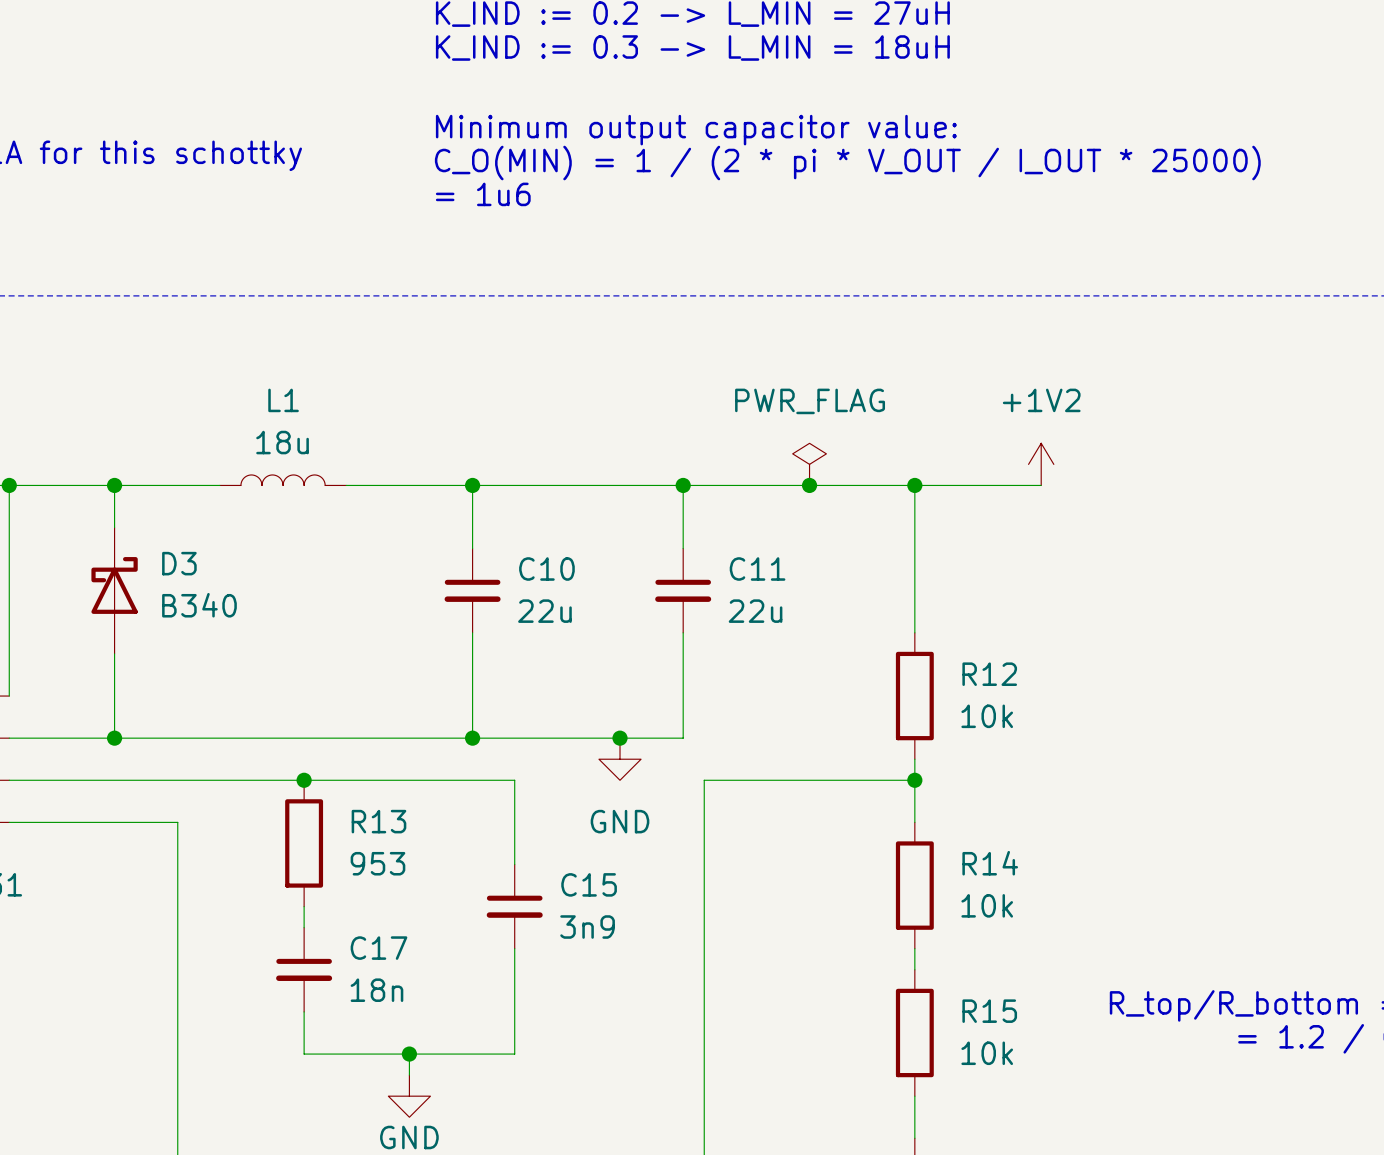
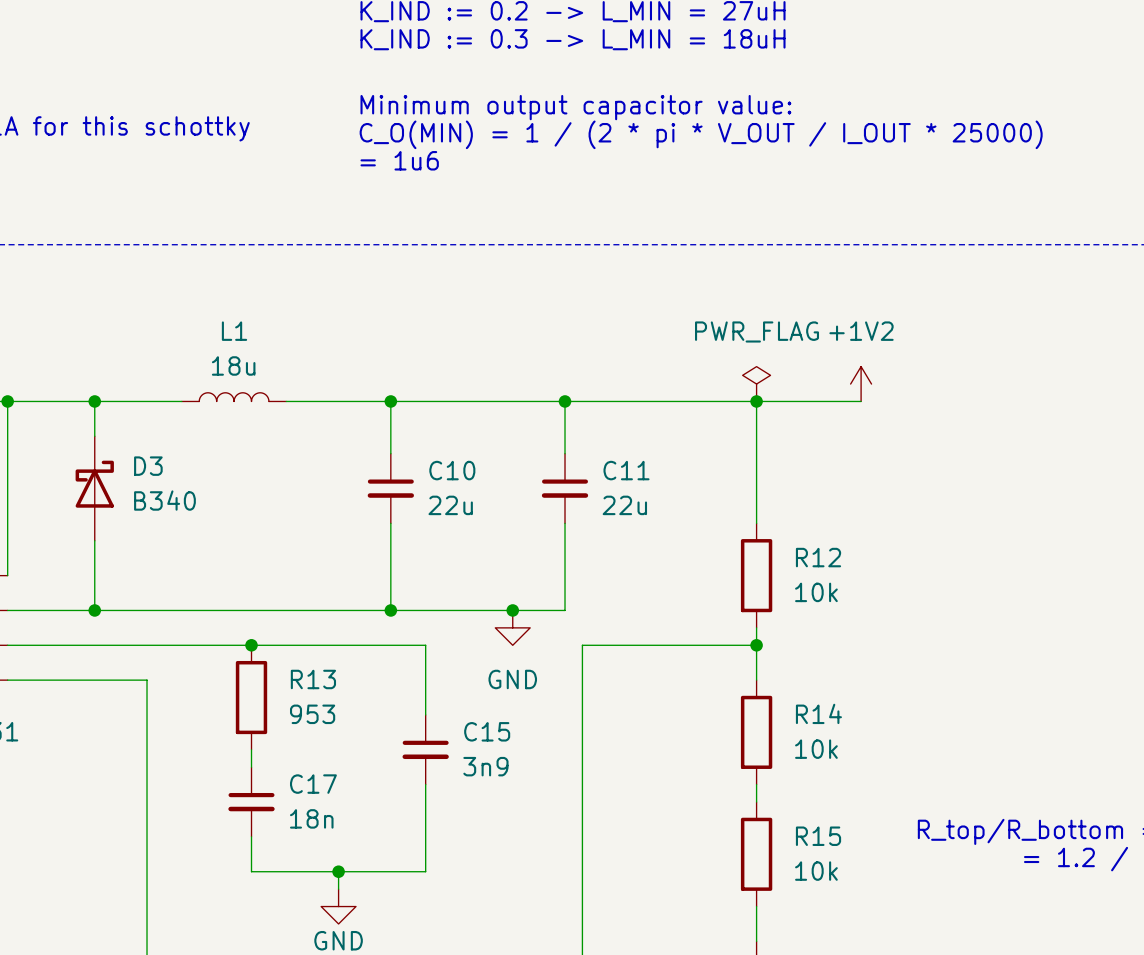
power symbol position: PWR_FLAG (809, 464) -> PWR_FLAG (756, 384)
junction: (809, 485) -> none

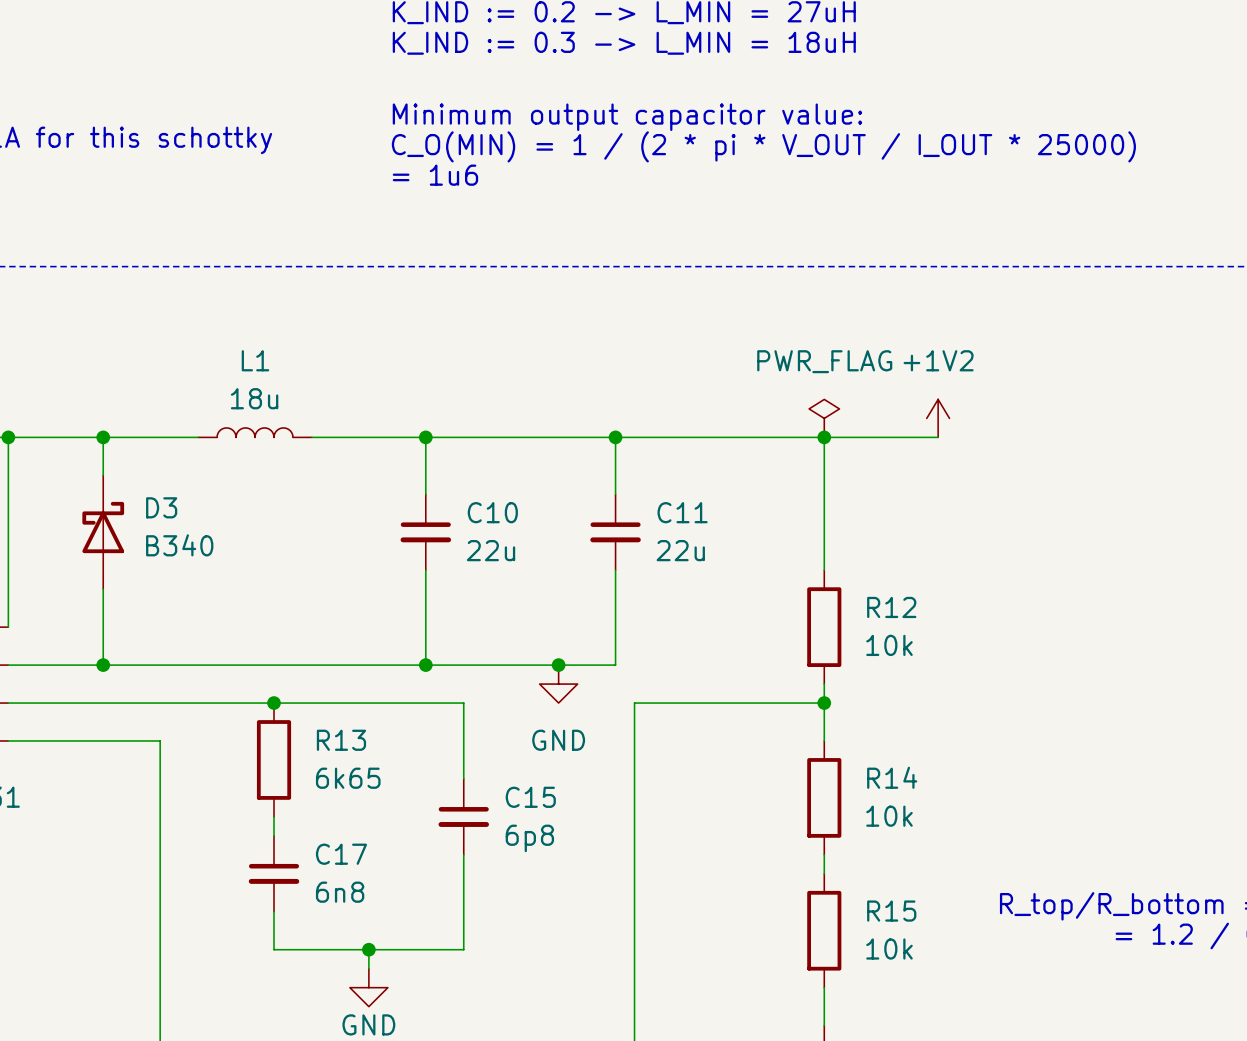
R13 value: 953 (312, 714) -> 6k65 (348, 778)
C15 value: 3n9 (485, 766) -> 6p8 (529, 838)
C17 value: 18n (311, 818) -> 6n8 (340, 892)

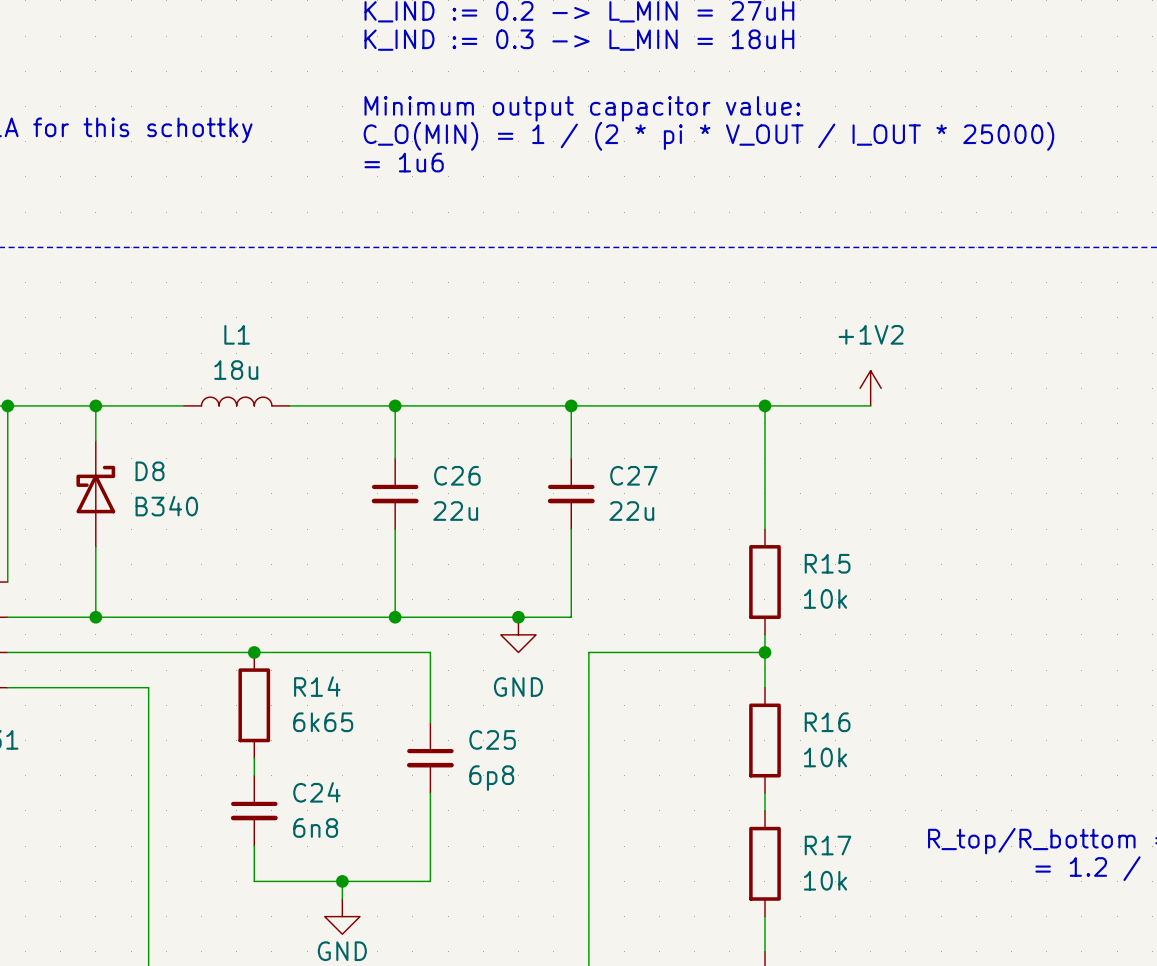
power symbol: PWR_FLAG (824, 418) -> none
D3 name: D3 (161, 507) -> D8 (150, 471)
C10 name: C10 (492, 512) -> C26 (457, 475)
C11 name: C11 (682, 512) -> C27 (633, 475)
R12 name: R12 (891, 607) -> R15 (827, 563)
R13 name: R13 (341, 740) -> R14 (317, 686)
R14 name: R14 (892, 777) -> R16 (827, 722)
C15 name: C15 (530, 797) -> C25 (492, 739)
C17 name: C17 (341, 854) -> C24 (316, 792)
R15 name: R15 (891, 911) -> R17 (828, 845)

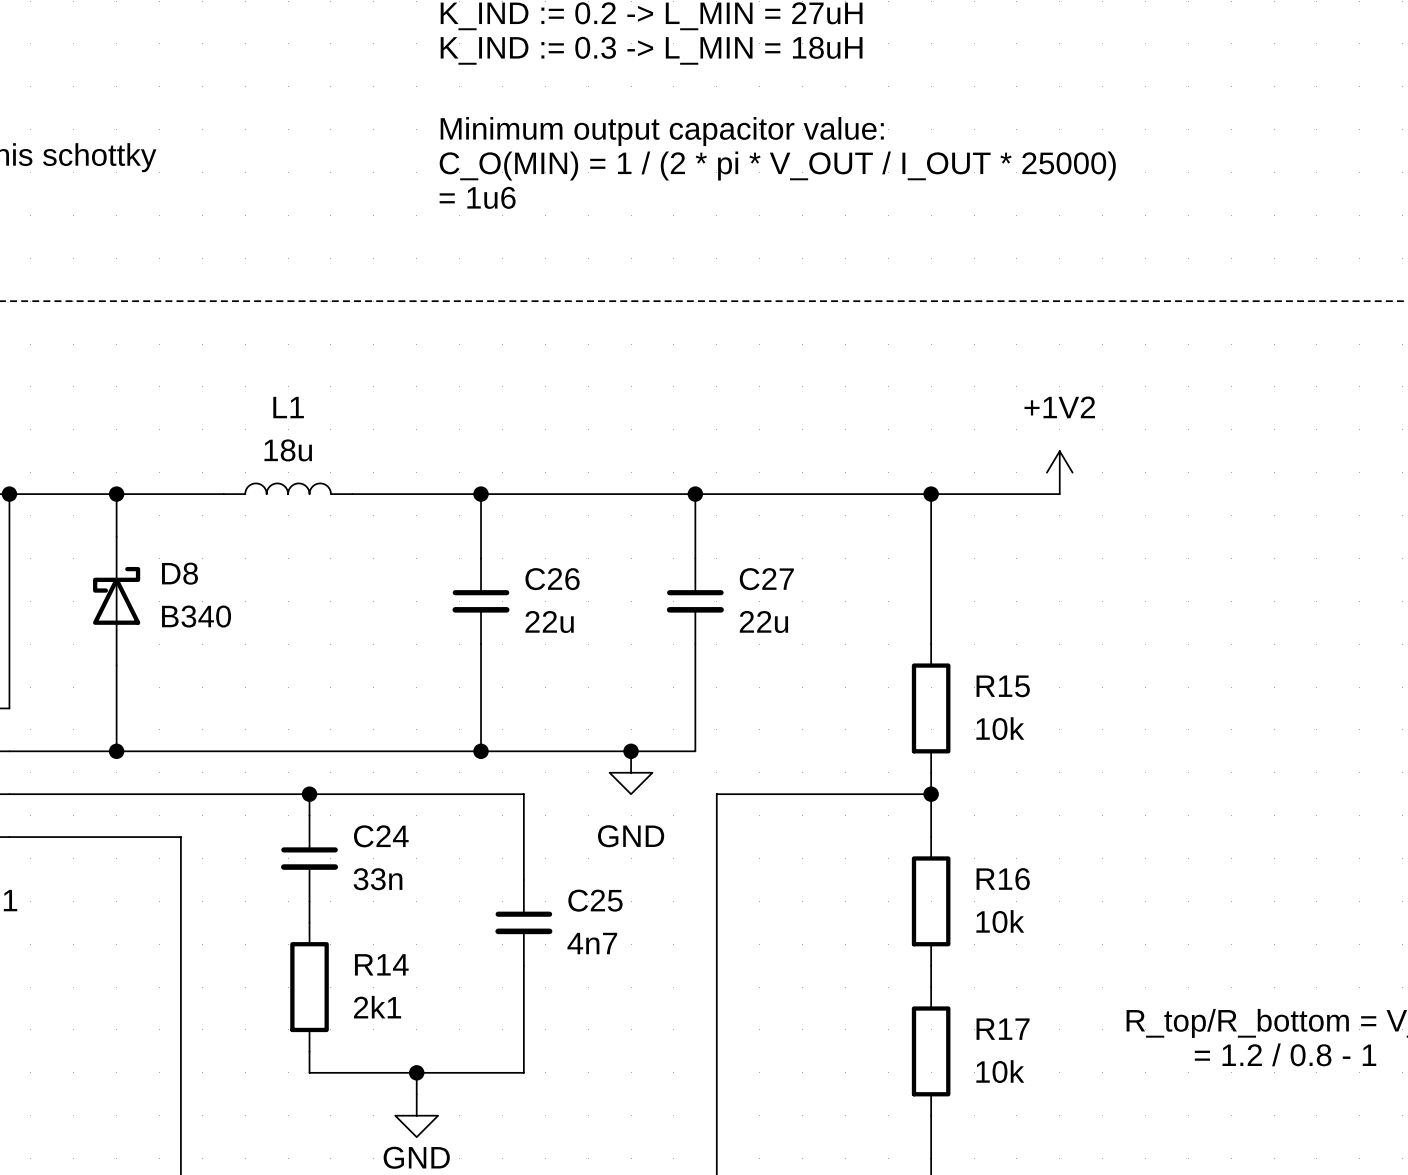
R14 position: (254, 705) -> (309, 987)
R14 value: 6k65 (323, 722) -> 2k1 (377, 1007)
C25 value: 6p8 (491, 778) -> 4n7 (592, 943)
C24 position: (254, 810) -> (309, 858)
C24 value: 6n8 (315, 828) -> 33n (377, 879)

